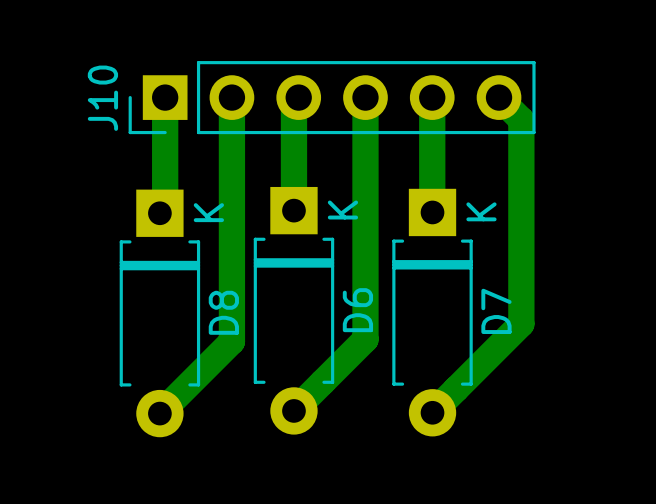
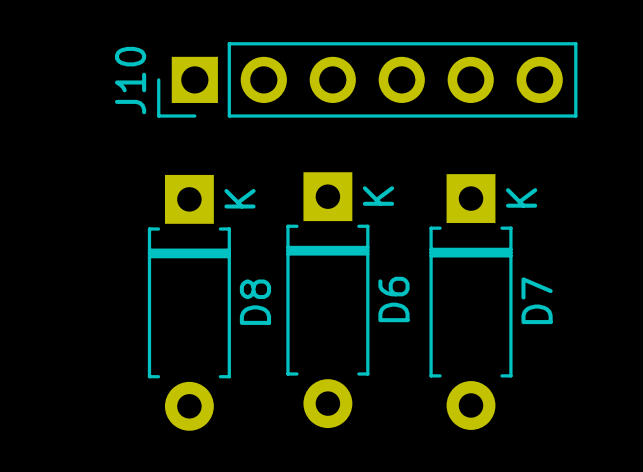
bottom track: (165, 97) (165, 208) (159, 213) -> none
bottom track: (231, 97) (231, 341) (159, 413) -> none
bottom track: (298, 97) (293, 102) (293, 210) -> none
bottom track: (365, 97) (365, 339) (293, 410) -> none
bottom track: (432, 97) (432, 212) -> none
bottom track: (499, 97) (521, 119) (521, 323) (432, 412) -> none

